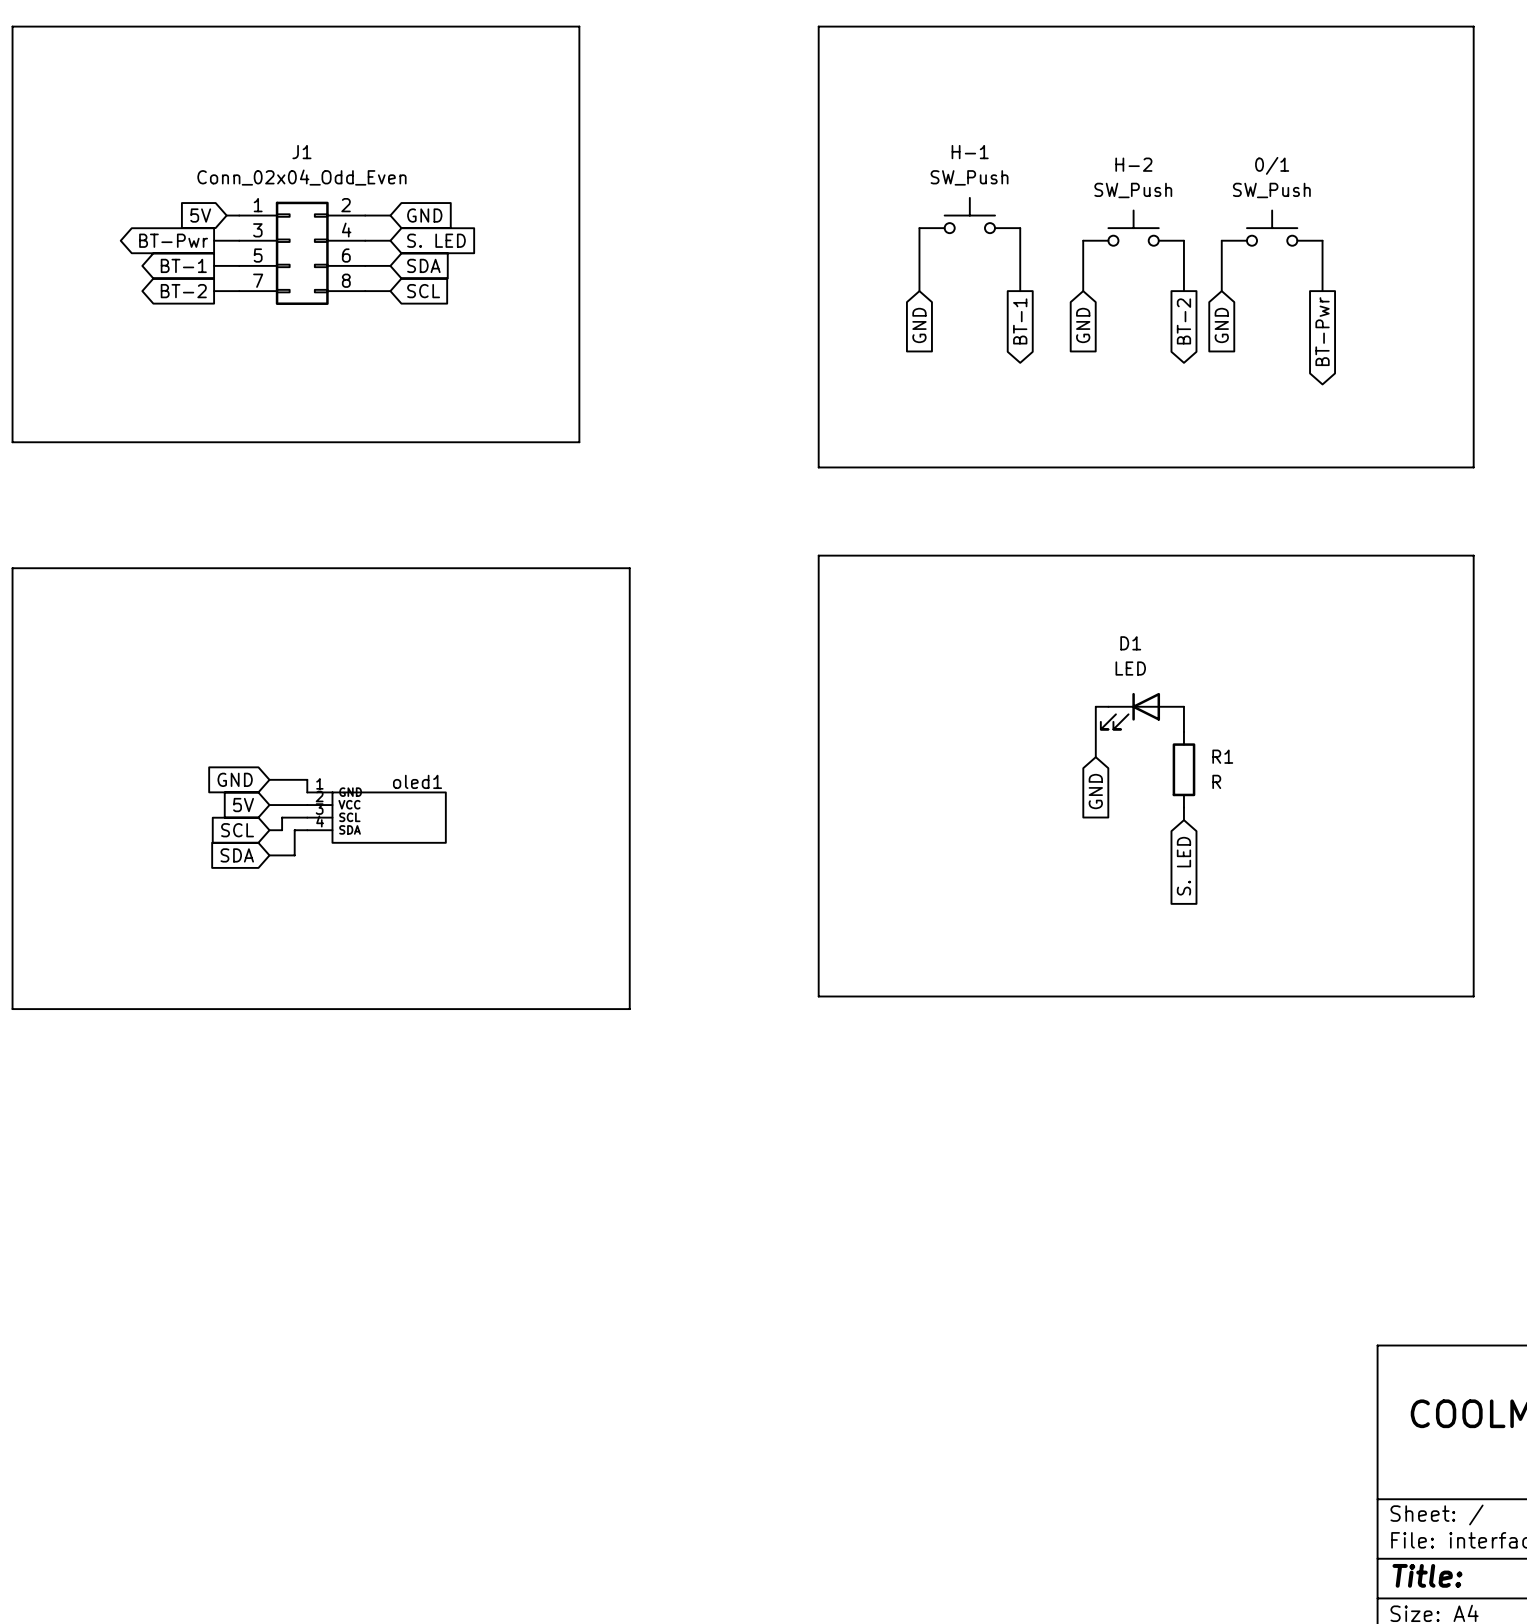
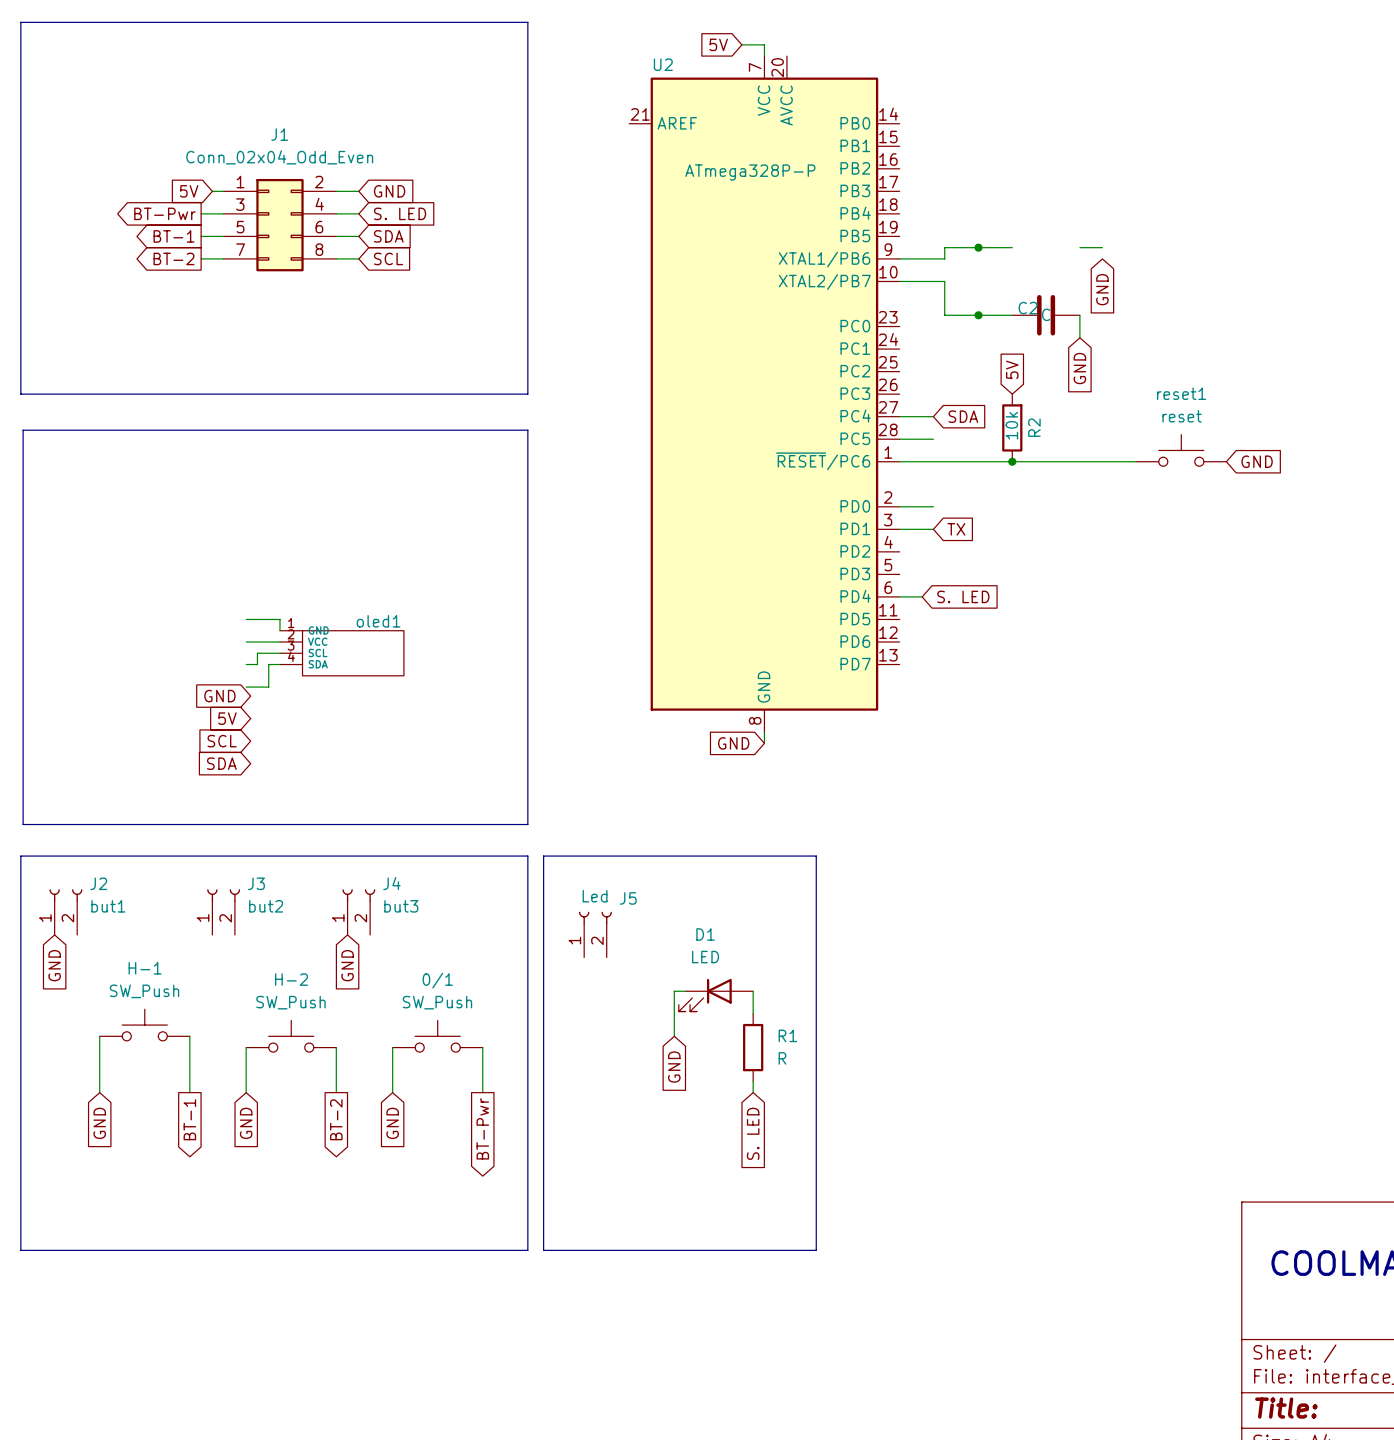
line: (818, 26) (818, 467) (1473, 467) (1473, 26) (818, 26) -> none
global label: none -> 5V (718, 44)
wire: none -> (741, 44) (764, 44) (764, 56)
H-1 position: (969, 215) -> (144, 1025)
wire: (1020, 228) (1020, 291) -> none
H-2 position: (1133, 228) -> (291, 1036)
0/1 position: (1272, 228) -> (437, 1036)
wire: (1083, 240) (1083, 291) -> none
wire: (1183, 240) (1183, 291) -> none
wire: (1221, 240) (1221, 291) -> none
wire: (1322, 240) (1322, 291) -> none
junction: none -> (978, 247)
wire: none -> (1012, 247) (944, 247) (944, 258) (899, 258)
wire: none -> (1079, 247) (1102, 247)
wire: none -> (899, 281) (944, 281) (944, 315) (1012, 315)
global label: BT-1 (1020, 321) -> none
global label: BT-2 (1183, 321) -> none
global label: GND (919, 325) -> none
global label position: GND (1083, 325) -> GND (1079, 368)
global label: BT-Pwr (1322, 331) -> none
junction: none -> (978, 315)
C2: none -> C (1046, 315)
wire: none -> (1079, 315) (1079, 337)
global label: none -> 5V (1012, 369)
U2: none -> ATmega328P-P (764, 394)
global label: none -> SDA (963, 416)
R2: none -> 10k (1012, 427)
line: none -> (23, 430) (527, 430) (527, 824) (23, 824) (23, 430)
wire: none -> (899, 439) (933, 439)
reset1: none -> reset (1181, 450)
wire: none -> (899, 461) (1136, 461)
junction: none -> (1012, 461)
global label: none -> GND (1257, 461)
line: (818, 555) (1473, 555) (1473, 996) (818, 996) (818, 555) -> none
wire: none -> (899, 506) (933, 506)
wire: none -> (899, 529) (933, 529)
global label: none -> TX (956, 529)
wire: none -> (899, 596) (922, 596)
wire: (1108, 706) (1095, 706) (1095, 757) -> none
wire: (1183, 706) (1183, 731) -> none
D1 position: (1142, 711) -> (715, 995)
R1 position: (1183, 769) -> (753, 1047)
wire: (269, 779) (307, 779) (307, 792) -> (246, 619) (279, 619) (279, 630)
global label: GND (1095, 791) -> none
wire: (269, 805) (307, 805) -> (246, 642) (279, 642)
wire: (1183, 807) (1183, 820) -> none
wire: (307, 817) (282, 817) (282, 830) (269, 830) -> (279, 653) (257, 653) (257, 664) (246, 664)
oled1 position: (376, 817) -> (341, 653)
wire: none -> (764, 732) (764, 743)
wire: (307, 830) (294, 830) (294, 855) (269, 855) -> (279, 664) (268, 664) (268, 687) (246, 687)
global label: none -> GND (733, 743)
global label rotation: 0° (1183, 866) -> 90° counterclockwise (963, 596)
global label position: S. LED (1183, 866) -> S. LED (963, 596)
line: (12, 958) (12, 568) (629, 568) (629, 1009) (12, 1009) -> (20, 856) (527, 856) (527, 1250) (20, 1250) (20, 901)
line: none -> (543, 856) (816, 856) (816, 1250) (543, 1250) (543, 856)
J2: none -> but1 (65, 912)
J3: none -> but2 (223, 912)
J4: none -> but3 (358, 912)
J5: none -> Led (595, 934)
global label: none -> GND (54, 965)
global label: none -> GND (347, 965)
wire: none -> (685, 991) (674, 991) (674, 1036)
wire: none -> (753, 991) (753, 1013)
wire: none -> (99, 1036) (99, 1092)
wire: none -> (189, 1036) (189, 1092)
wire: none -> (246, 1047) (246, 1092)
wire: none -> (336, 1047) (336, 1092)
wire: none -> (392, 1047) (392, 1092)
wire: none -> (482, 1047) (482, 1092)
global label: none -> GND (674, 1067)
wire: none -> (753, 1081) (753, 1092)
global label: none -> BT-1 (189, 1119)
global label: none -> BT-2 (336, 1119)
global label: none -> GND (99, 1123)
global label: none -> GND (246, 1123)
global label: none -> GND (392, 1123)
global label: none -> BT-Pwr (482, 1128)
global label: none -> S. LED (753, 1133)

